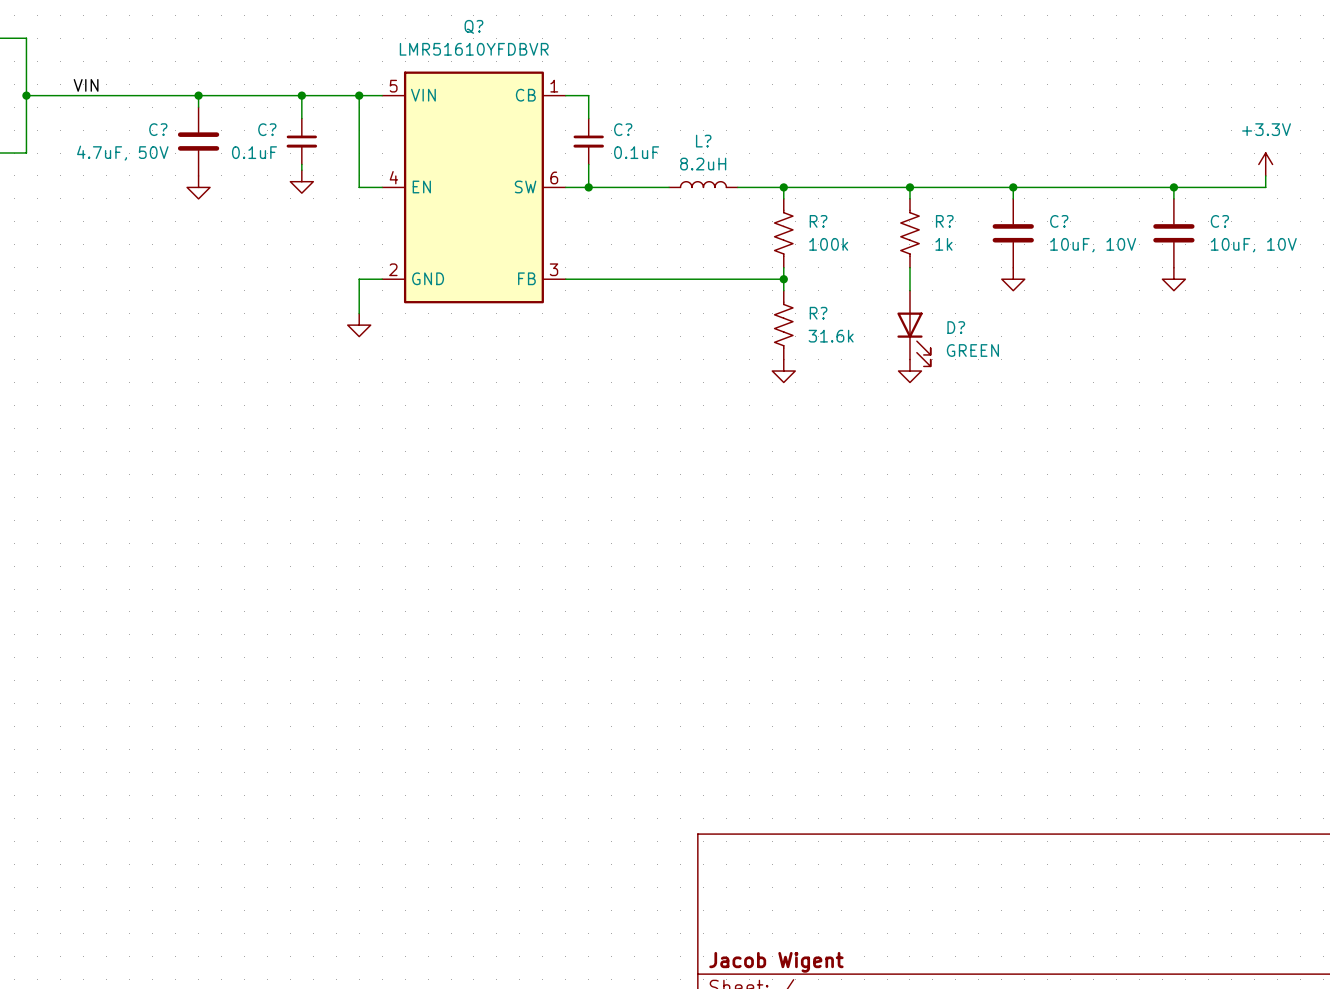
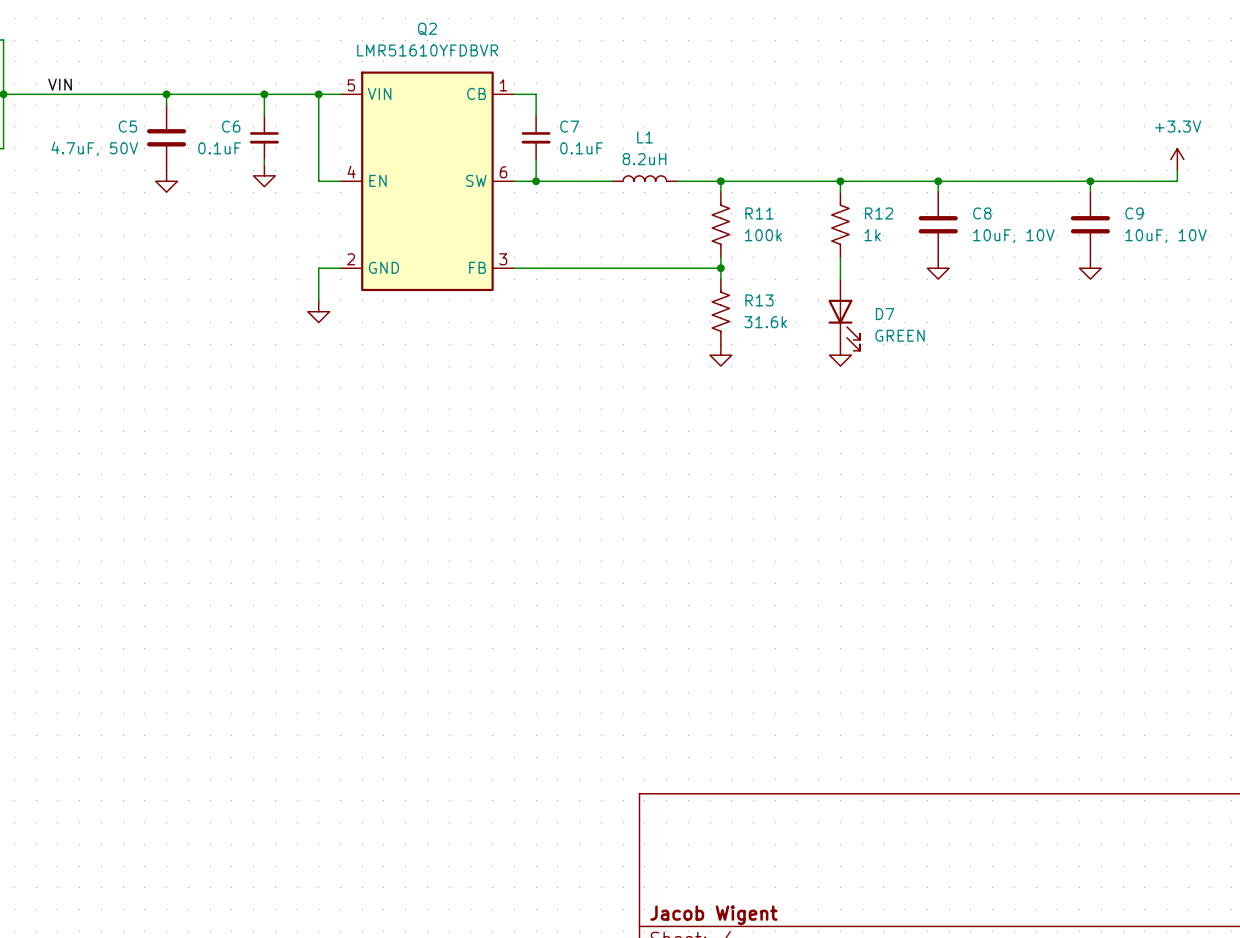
Q? name: Q? (473, 26) -> Q2 (427, 29)
C? name: C? (158, 129) -> C5 (127, 126)
C? name: C? (267, 129) -> C6 (231, 126)
C? name: C? (623, 129) -> C7 (569, 126)
L? name: L? (703, 141) -> L1 (645, 137)
R? name: R? (818, 221) -> R11 (759, 213)
R? name: R? (944, 221) -> R12 (879, 213)
C? name: C? (1059, 221) -> C8 (982, 213)
C? name: C? (1219, 221) -> C9 (1134, 213)
R? name: R? (818, 313) -> R13 (759, 300)
D? name: D? (956, 327) -> D7 (885, 314)

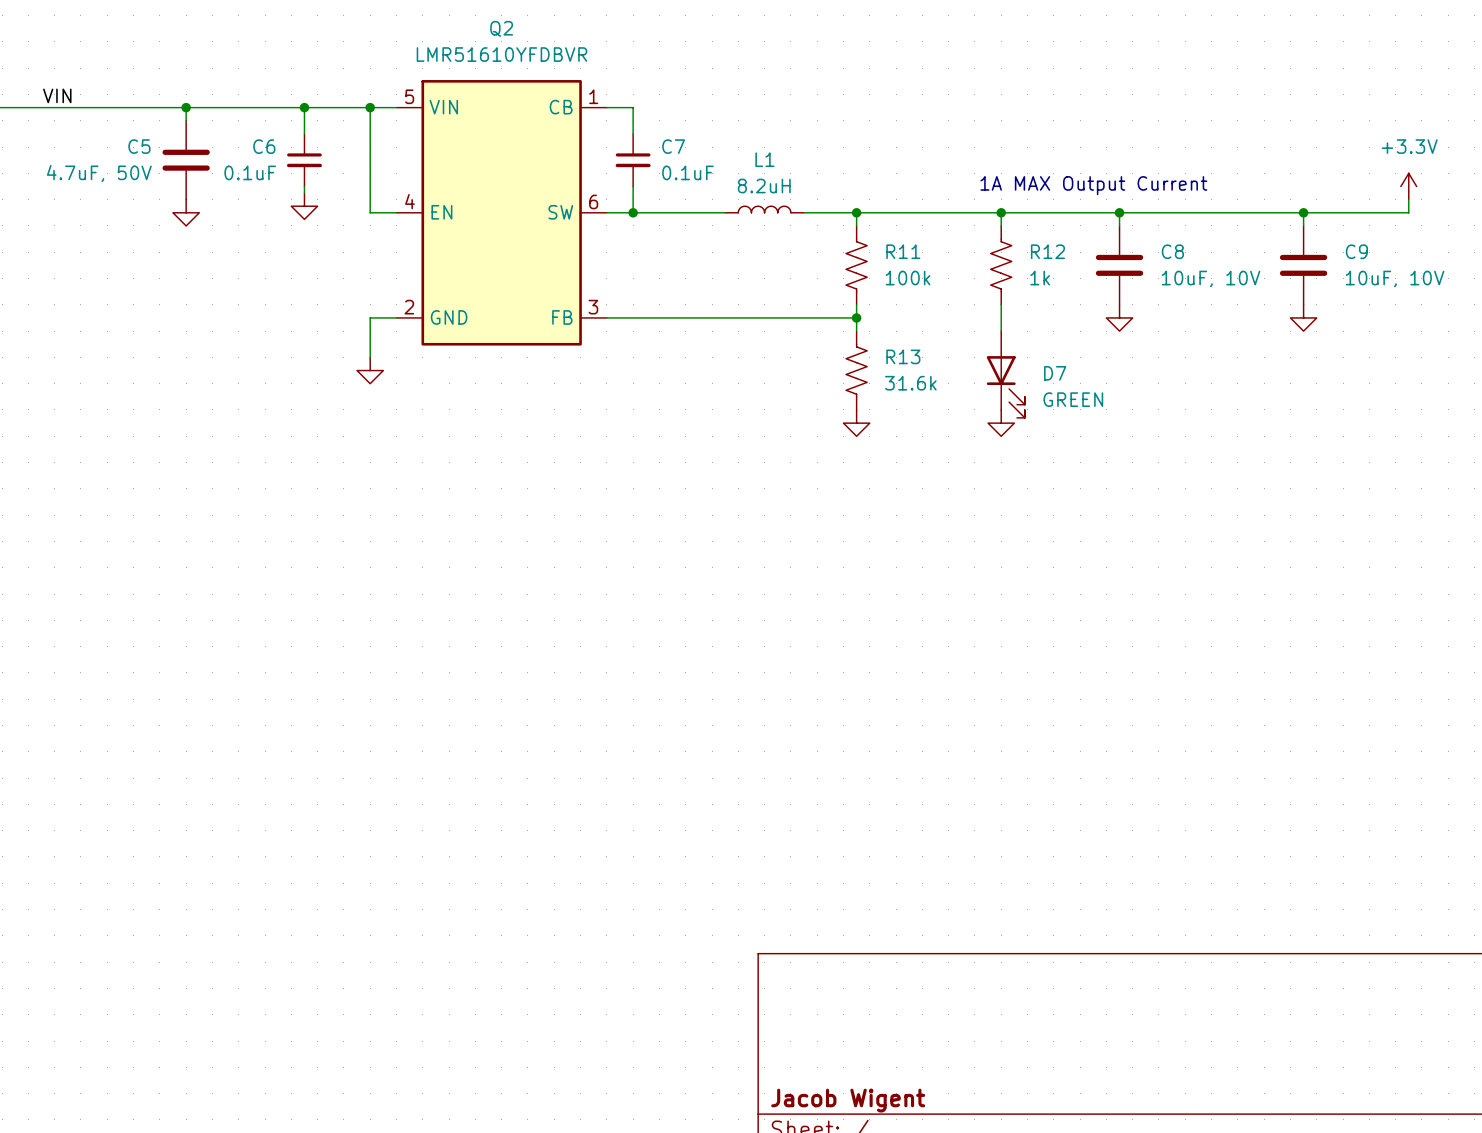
text: none -> 1A MAX Output Current (1093, 185)

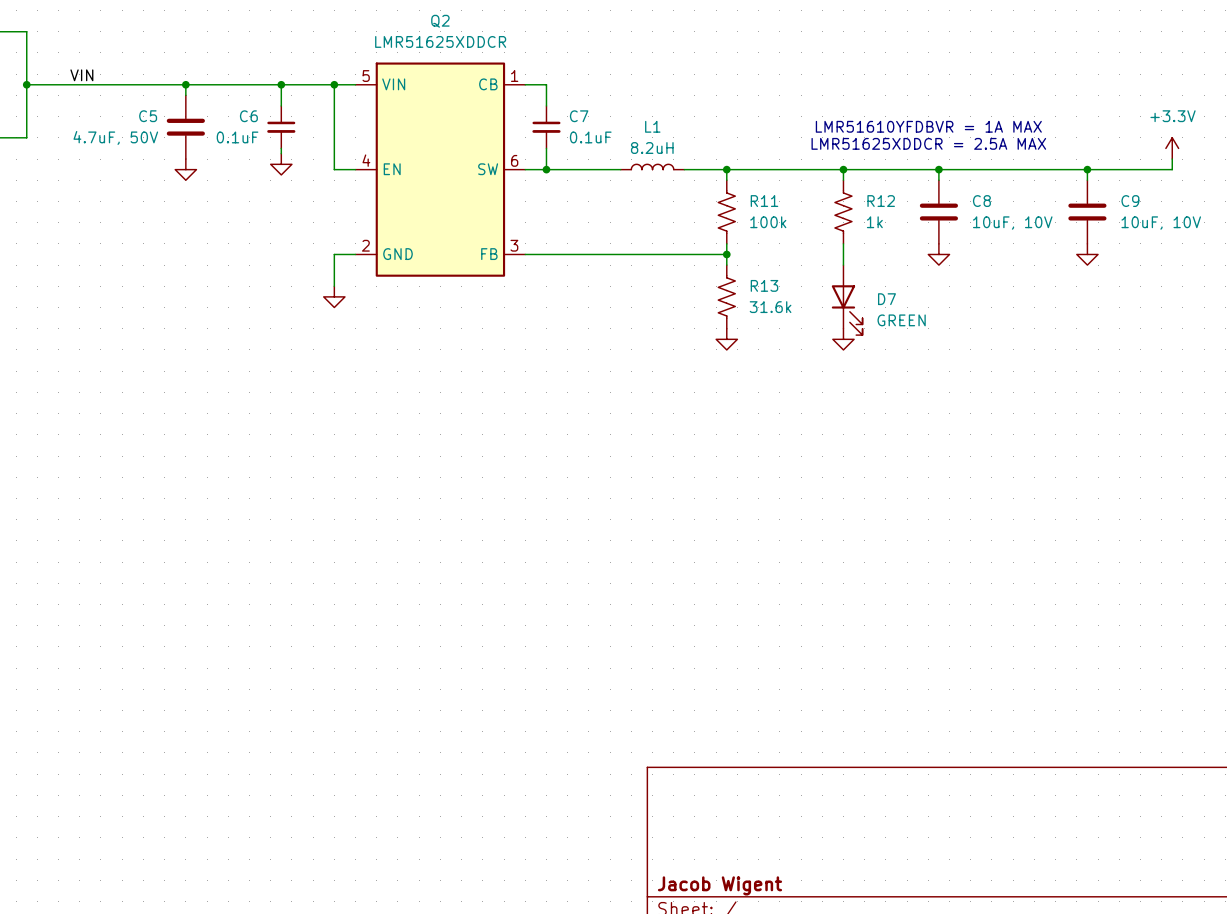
Q2 value: LMR51610YFDBVR (501, 54) -> LMR51625XDDCR (440, 41)
text: none -> LMR51610YFDBVR = 1A MAX (928, 126)
text: none -> LMR51625XDDCR = 2.5A MAX (928, 143)
text: 1A MAX Output Current (1093, 185) -> none

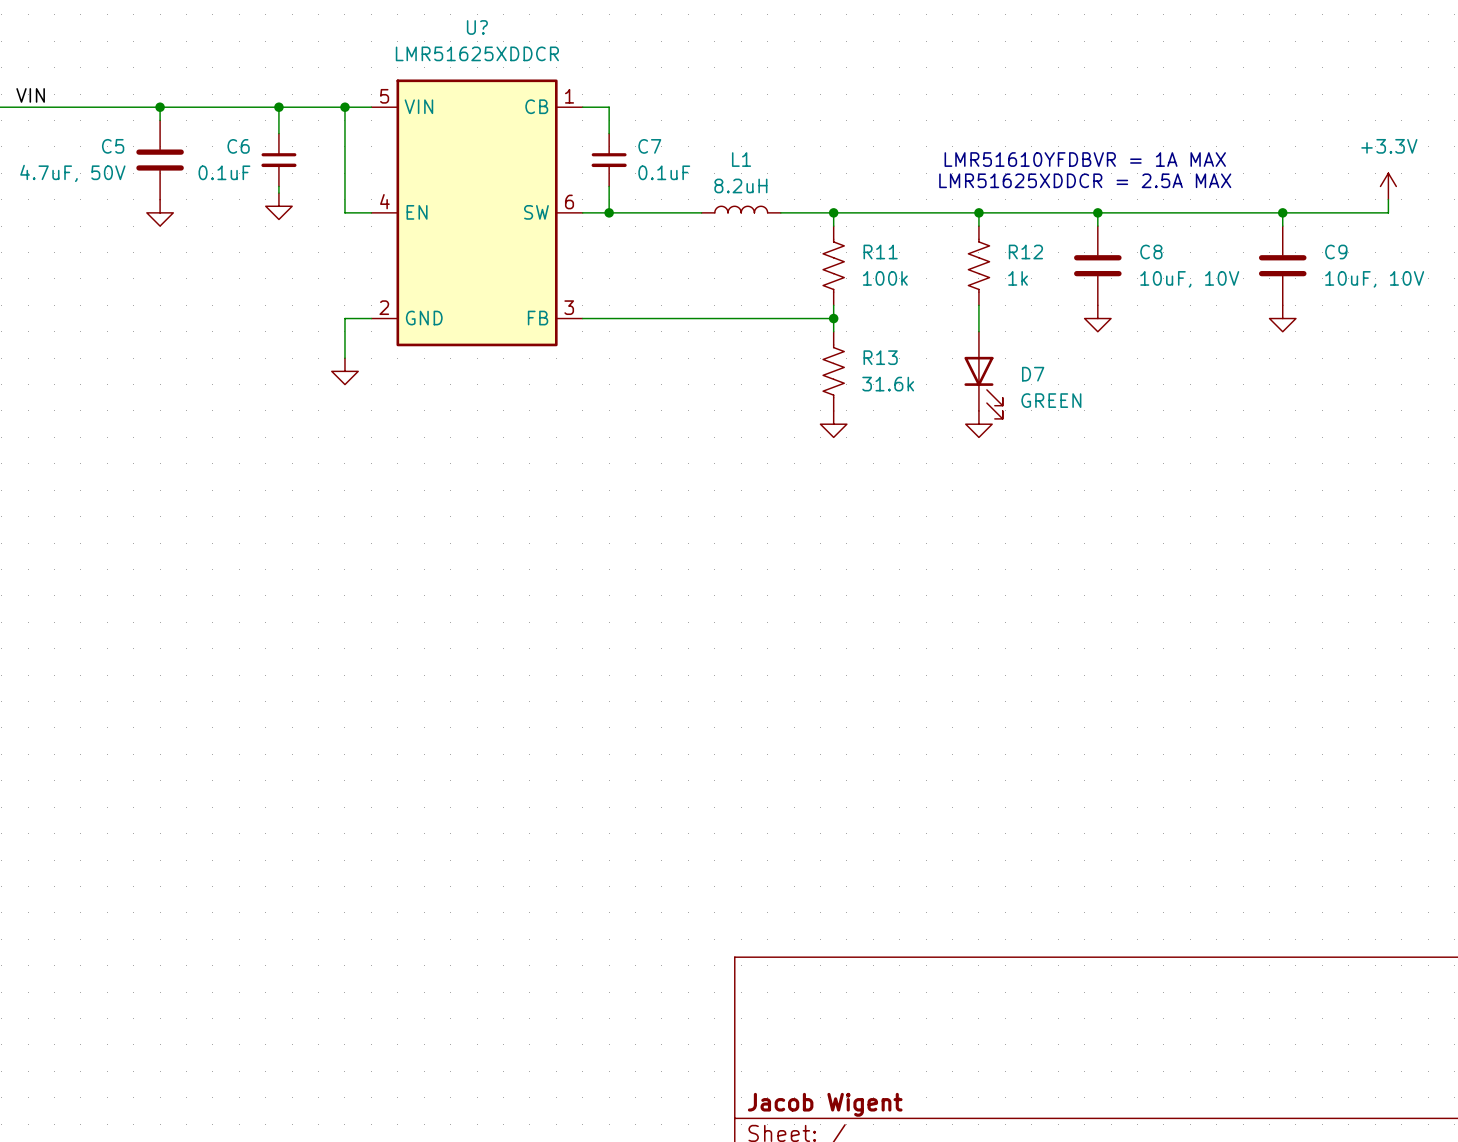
Q2 name: Q2 (440, 21) -> U? (477, 27)

